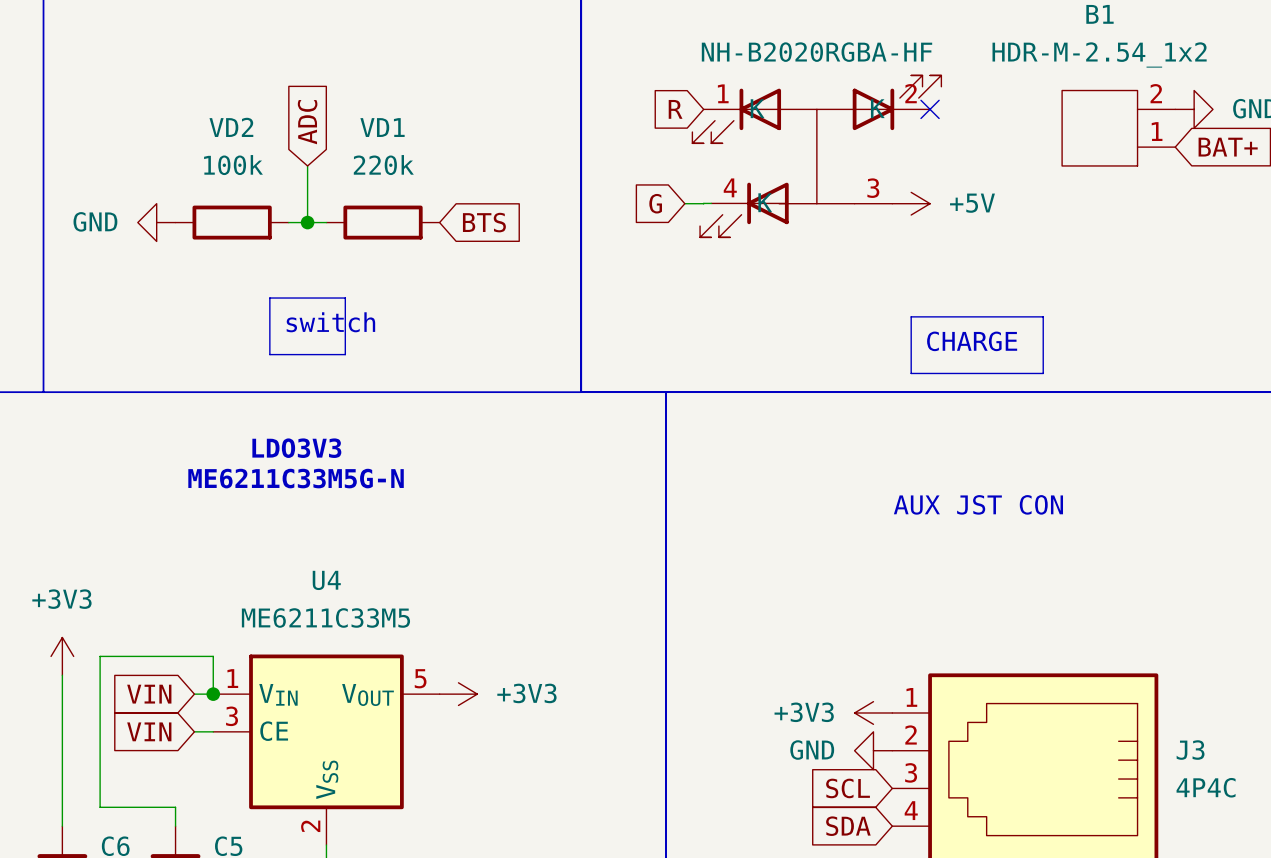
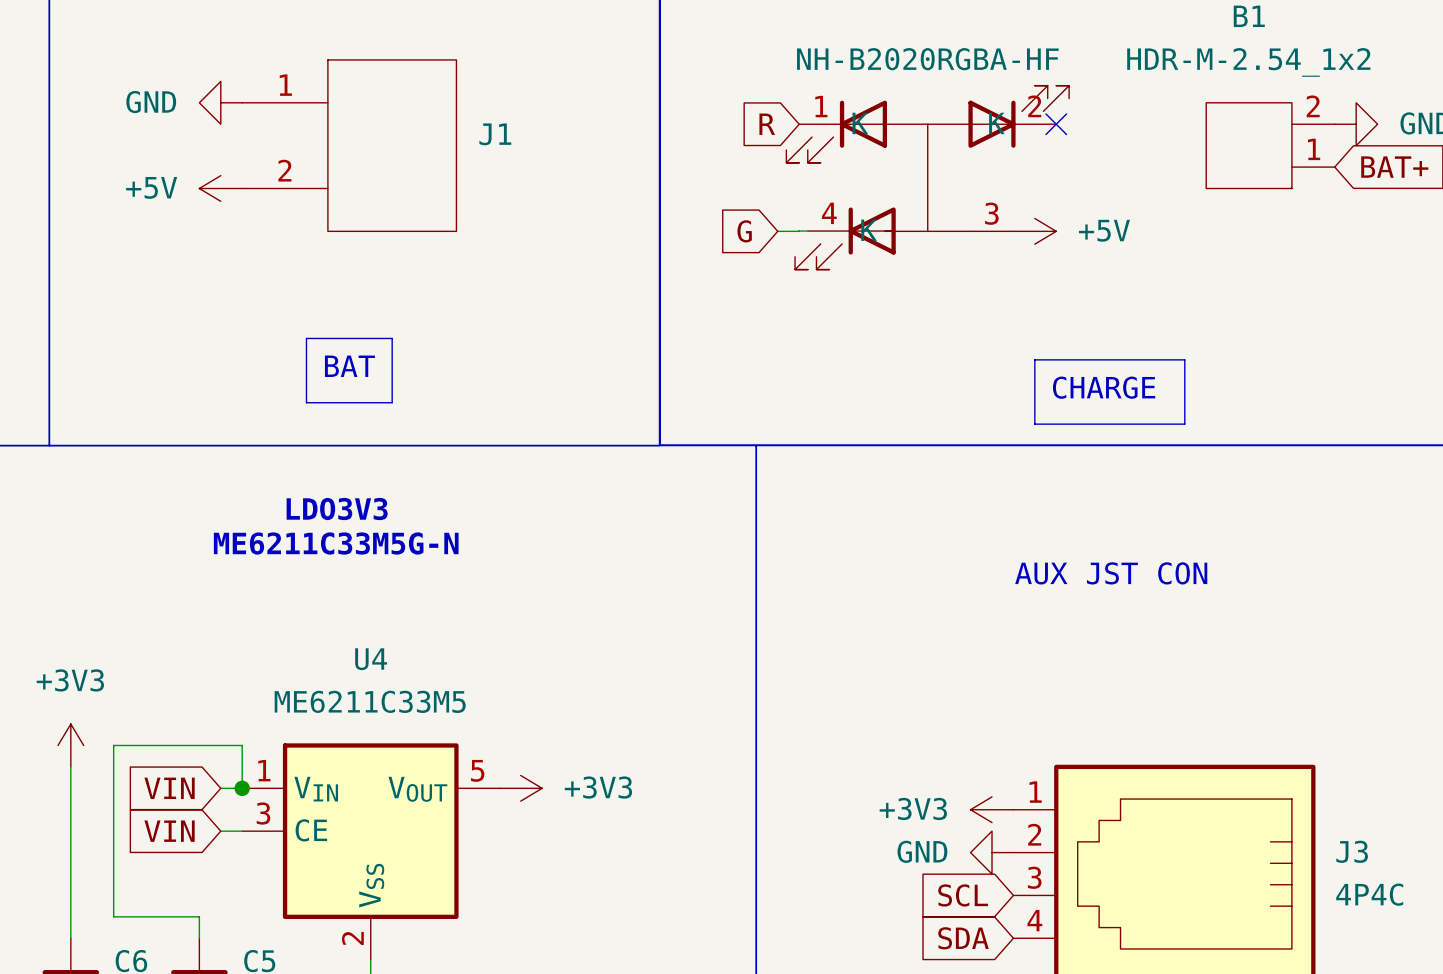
global label: ADC (307, 122) -> none
J1: none -> (349, 145)
power symbol: none -> +5V (220, 188)
wire: (307, 165) (307, 222) -> none
power symbol position: GND (156, 222) -> GND (220, 102)
VD2: 100k (232, 222) -> none
wire: (288, 222) (326, 222) -> none
junction: (307, 222) -> none
VD1: 220k (383, 222) -> none
global label: BTS (484, 222) -> none
text: switch (330, 322) -> BAT (349, 366)

